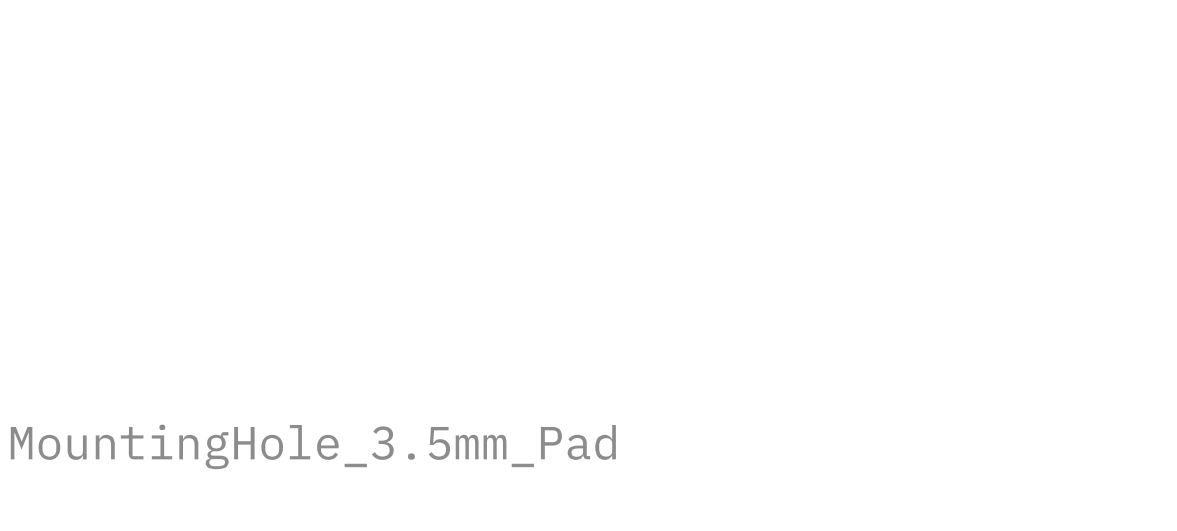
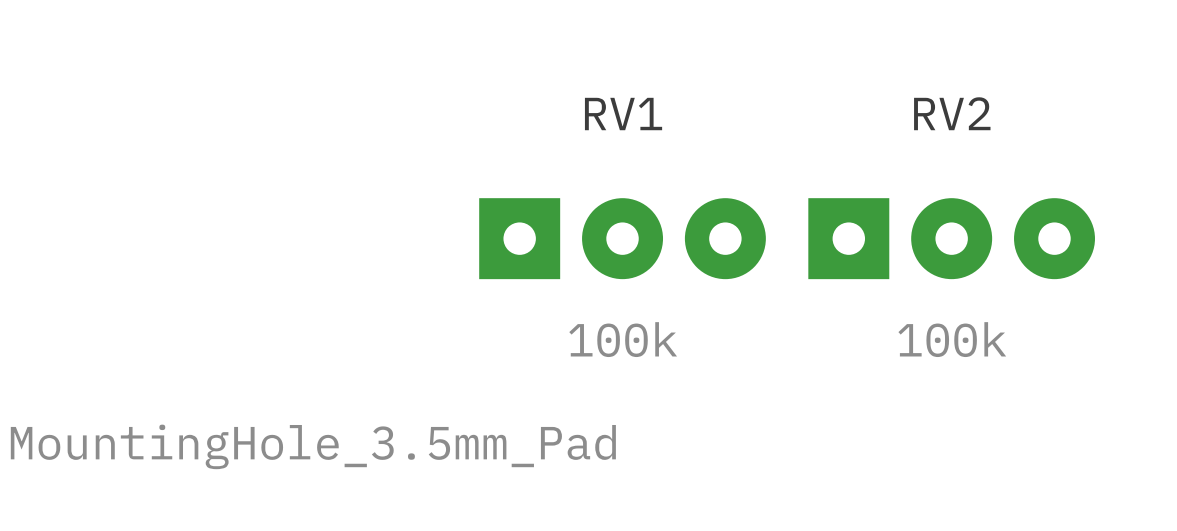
RV1: none -> 100k (622, 238)
RV2: none -> 100k (951, 238)

